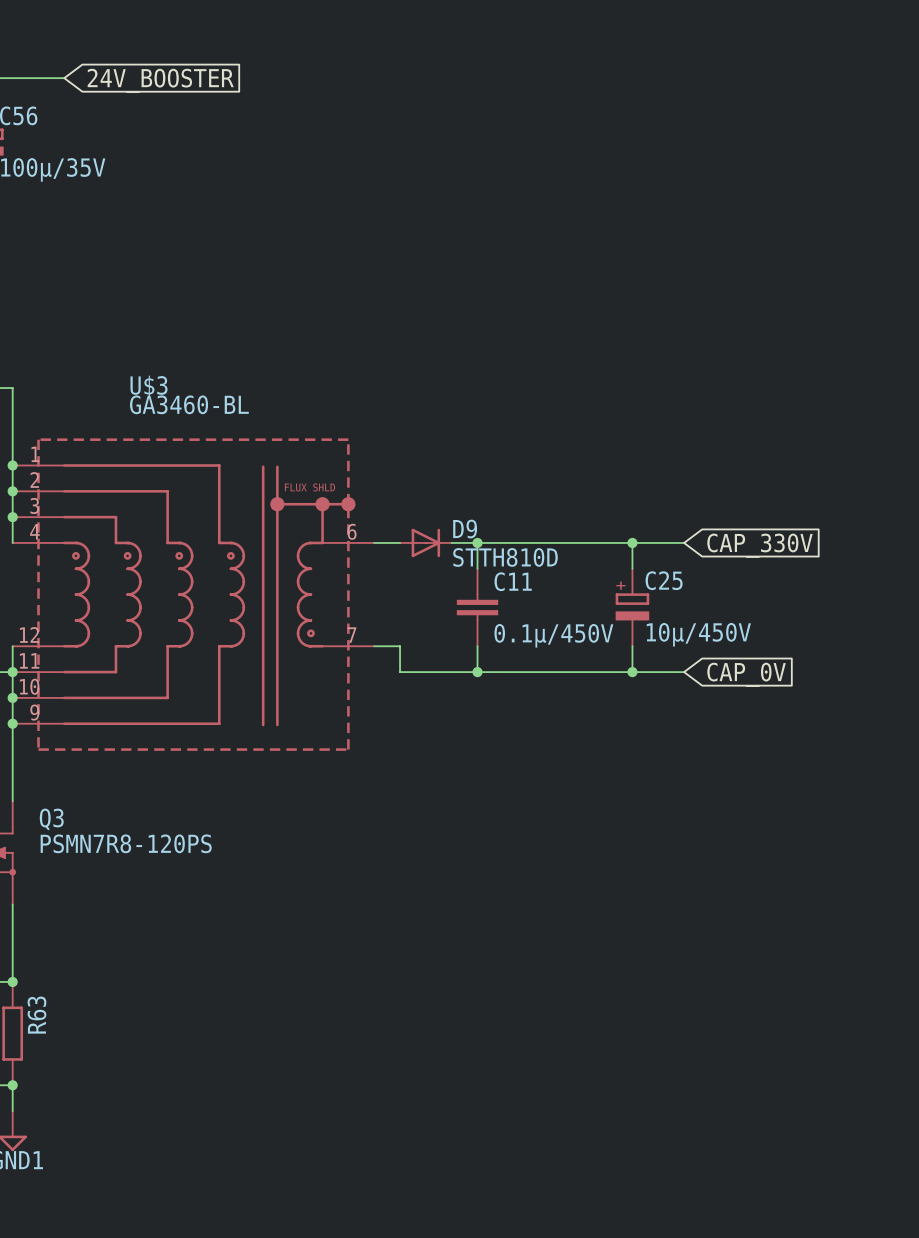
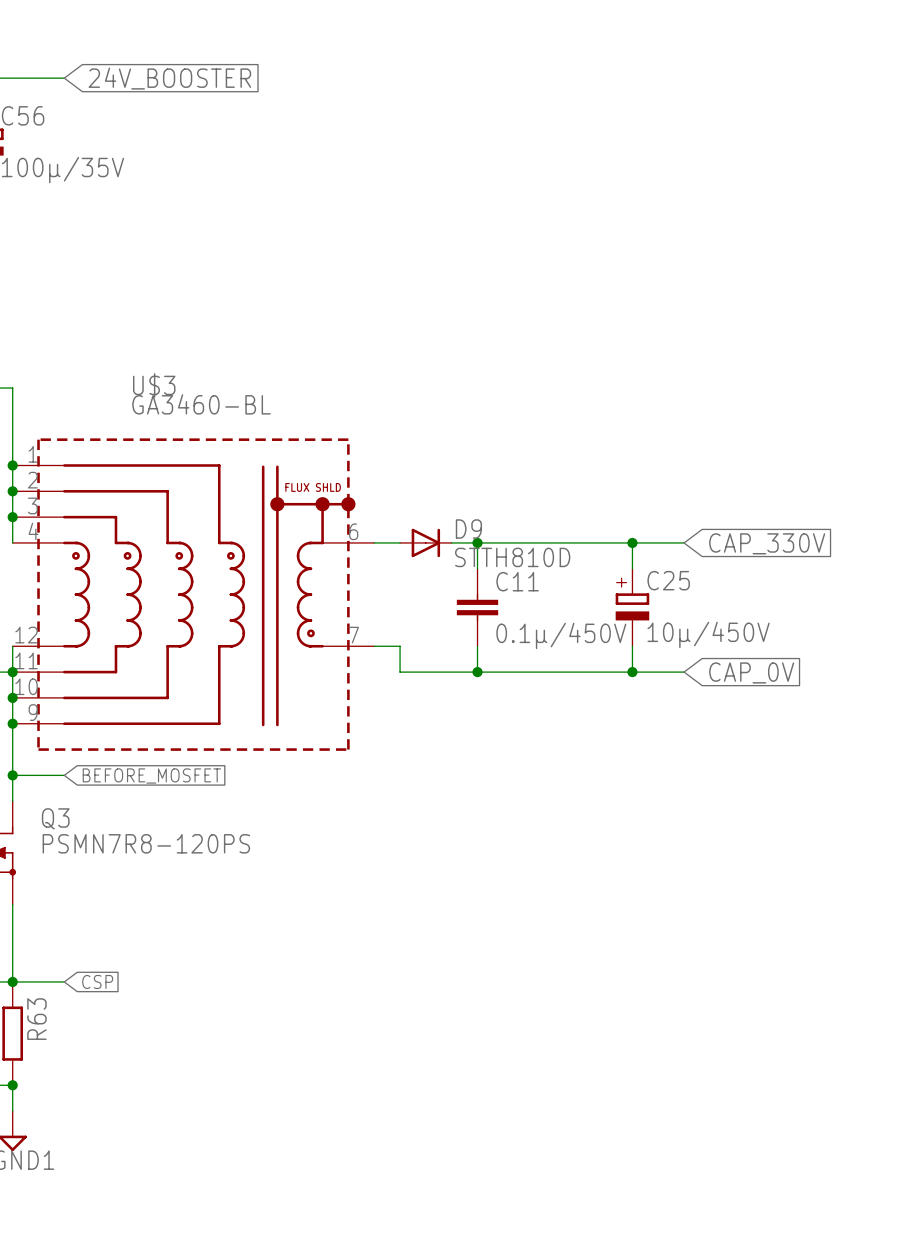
wire: none -> (12, 775) (64, 775)
junction: none -> (12, 775)
global label: none -> BEFORE_MOSFET (151, 776)
wire: none -> (12, 981) (64, 981)
global label: none -> CSP (97, 981)

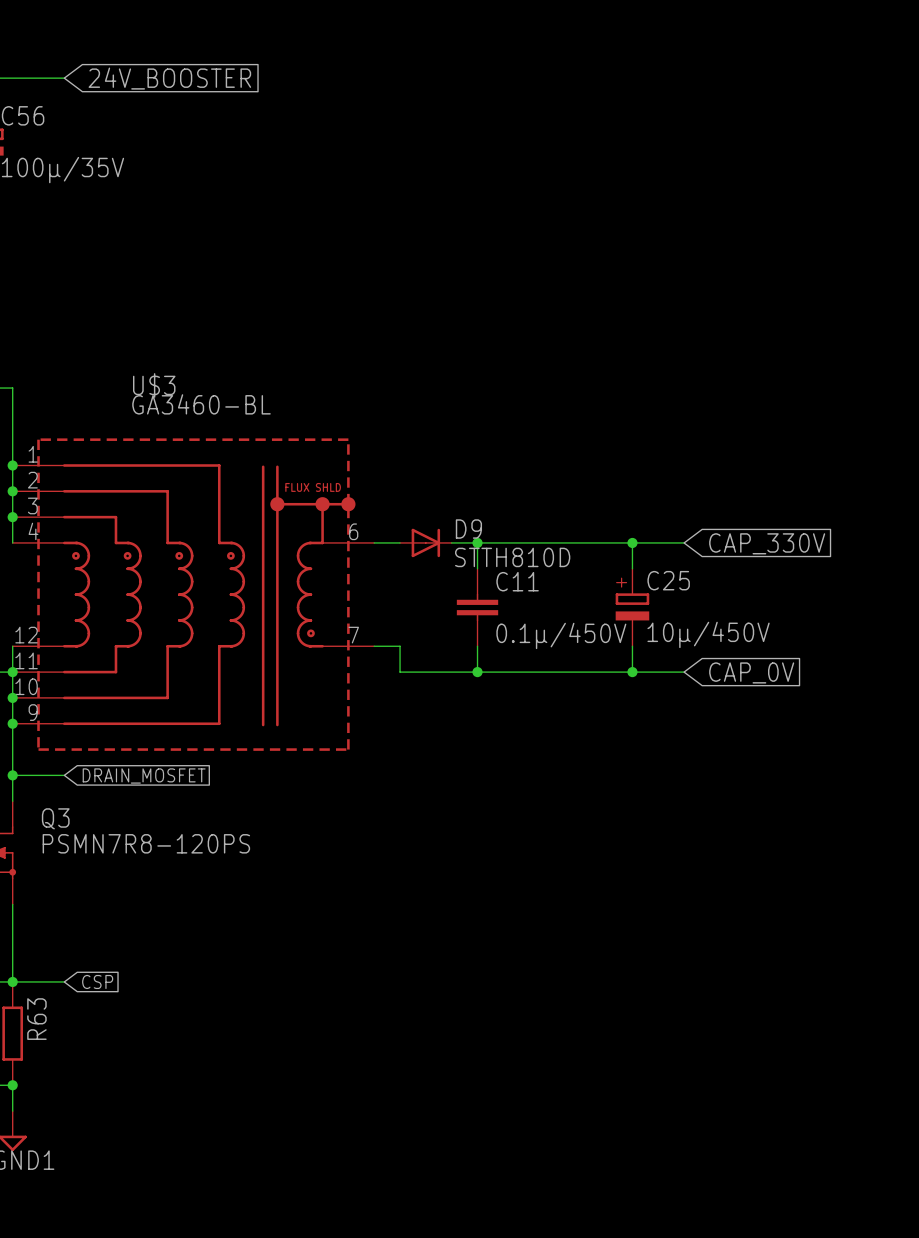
global label: BEFORE_MOSFET (151, 776) -> DRAIN_MOSFET (144, 776)

